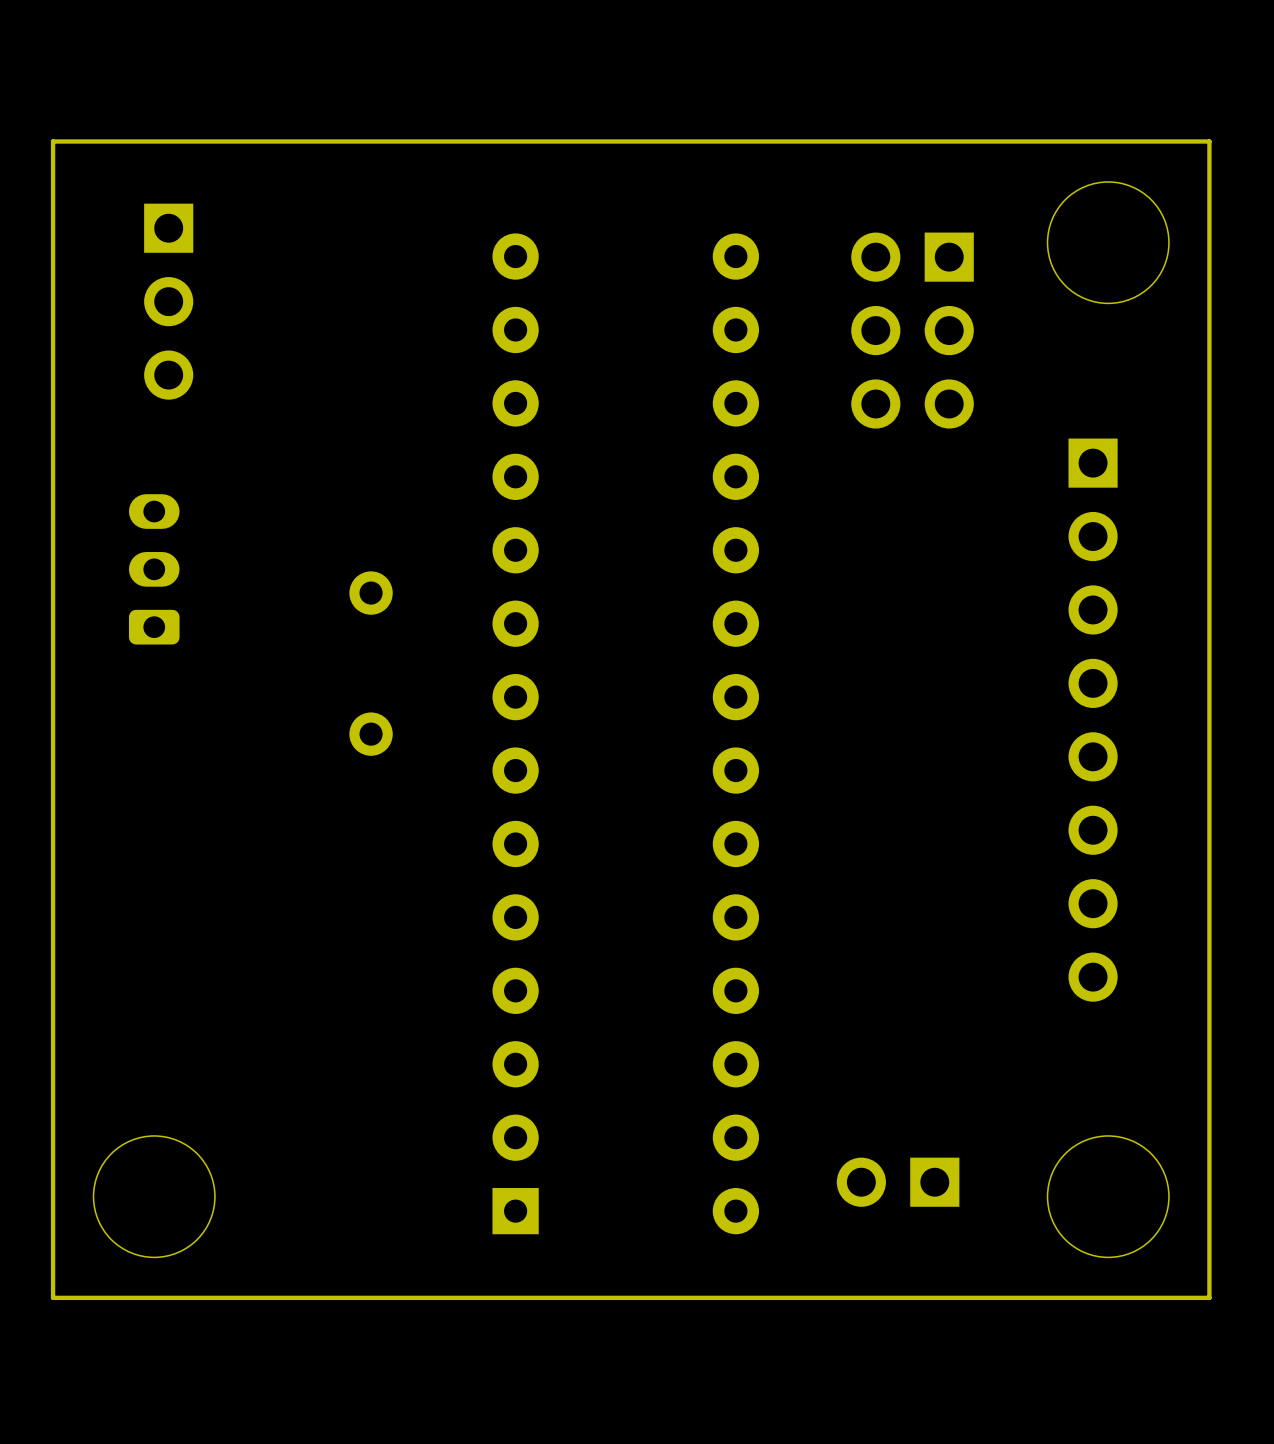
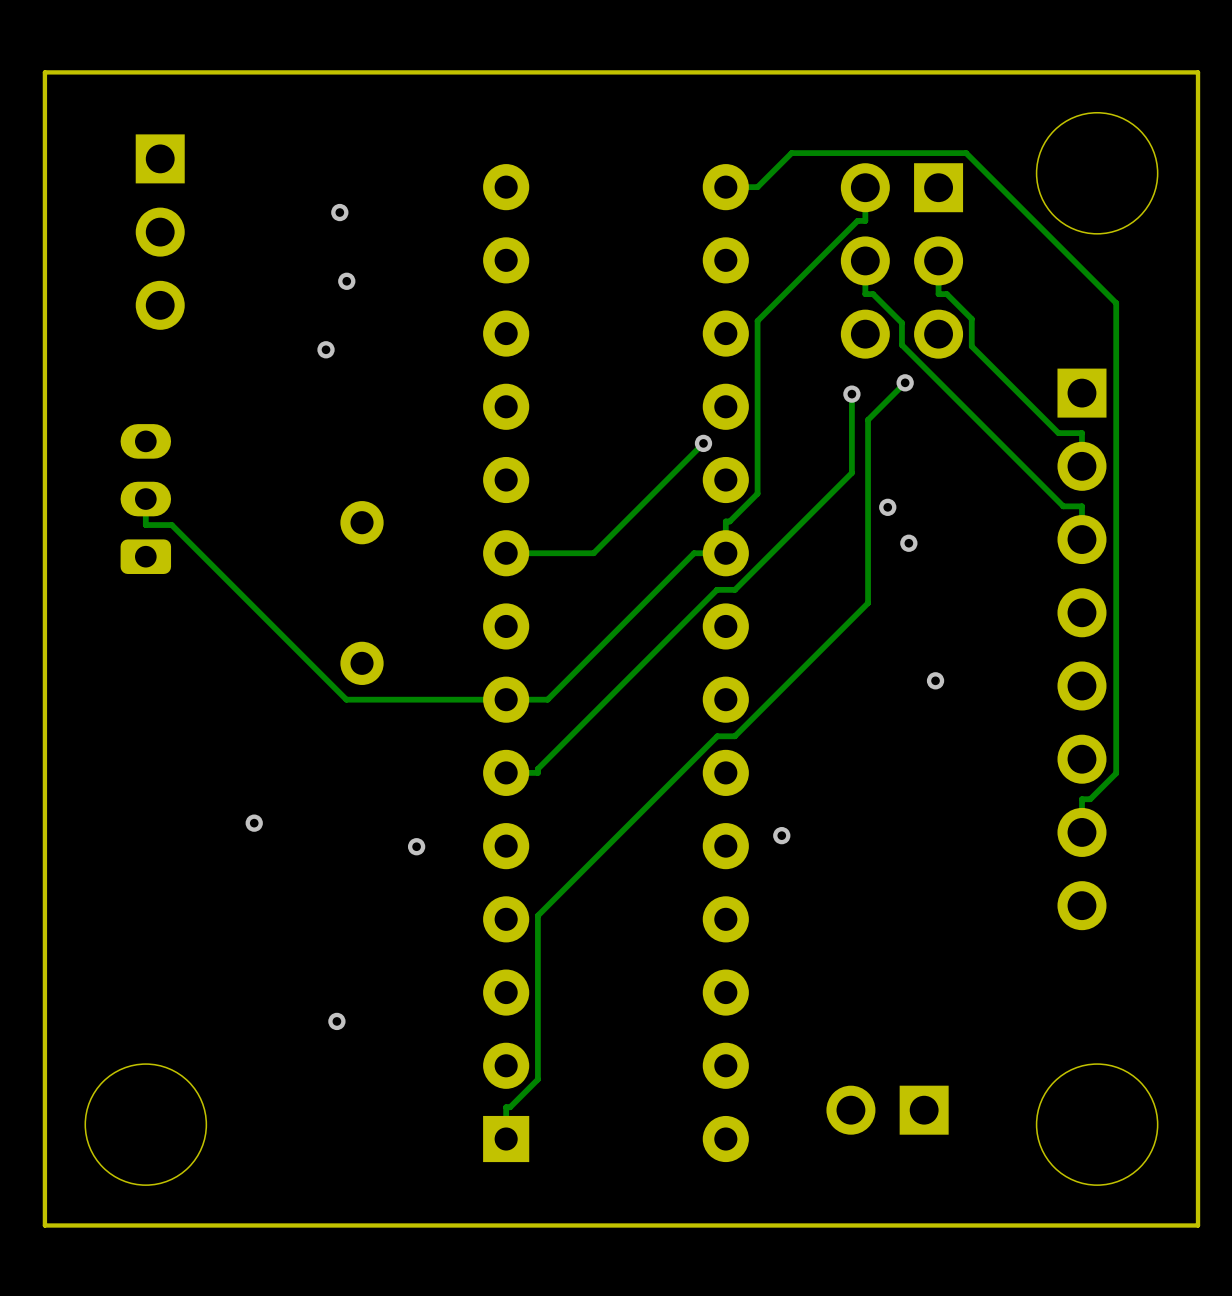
track: none -> (725, 187) (757, 187) (791, 153) (966, 153) (1116, 303) (1116, 773) (1090, 799) (1081, 799) (1081, 832)
track: none -> (865, 187) (865, 220) (857, 220) (757, 320) (757, 493) (729, 521) (725, 521) (725, 553) (694, 553) (547, 699) (346, 699) (171, 525) (145, 525) (145, 499)
via: none -> (339, 212)
track: none -> (865, 260) (865, 294) (873, 294) (901, 323) (901, 344) (1063, 506) (1081, 506) (1081, 539)
track: none -> (938, 260) (938, 294) (946, 294) (971, 319) (971, 346) (1058, 433) (1081, 433) (1081, 466)
via: none -> (346, 281)
via: none -> (326, 349)
track: none -> (905, 382) (868, 419) (868, 603) (734, 736) (717, 736) (537, 915) (537, 1079) (510, 1107) (506, 1107) (506, 1139)
via: none -> (905, 382)
track: none -> (851, 394) (851, 472) (735, 589) (717, 589) (537, 768) (537, 772) (506, 772)
via: none -> (851, 394)
track: none -> (703, 443) (593, 553) (506, 553)
via: none -> (703, 443)
via: none -> (887, 507)
via: none -> (908, 543)
via: none -> (935, 680)
via: none -> (254, 823)
via: none -> (781, 835)
via: none -> (416, 846)
via: none -> (336, 1021)

